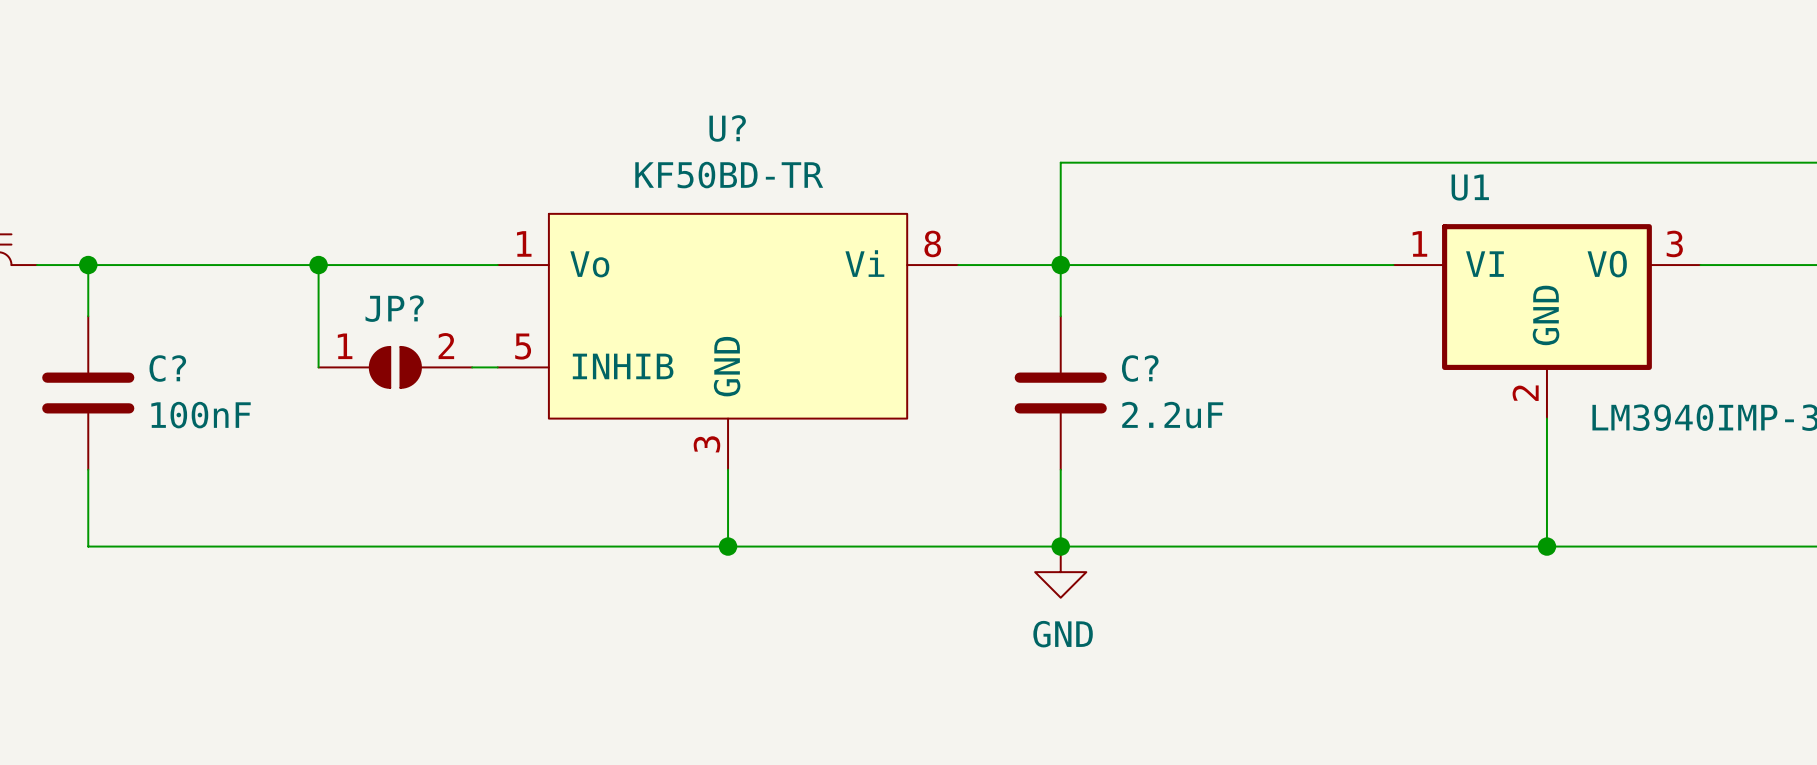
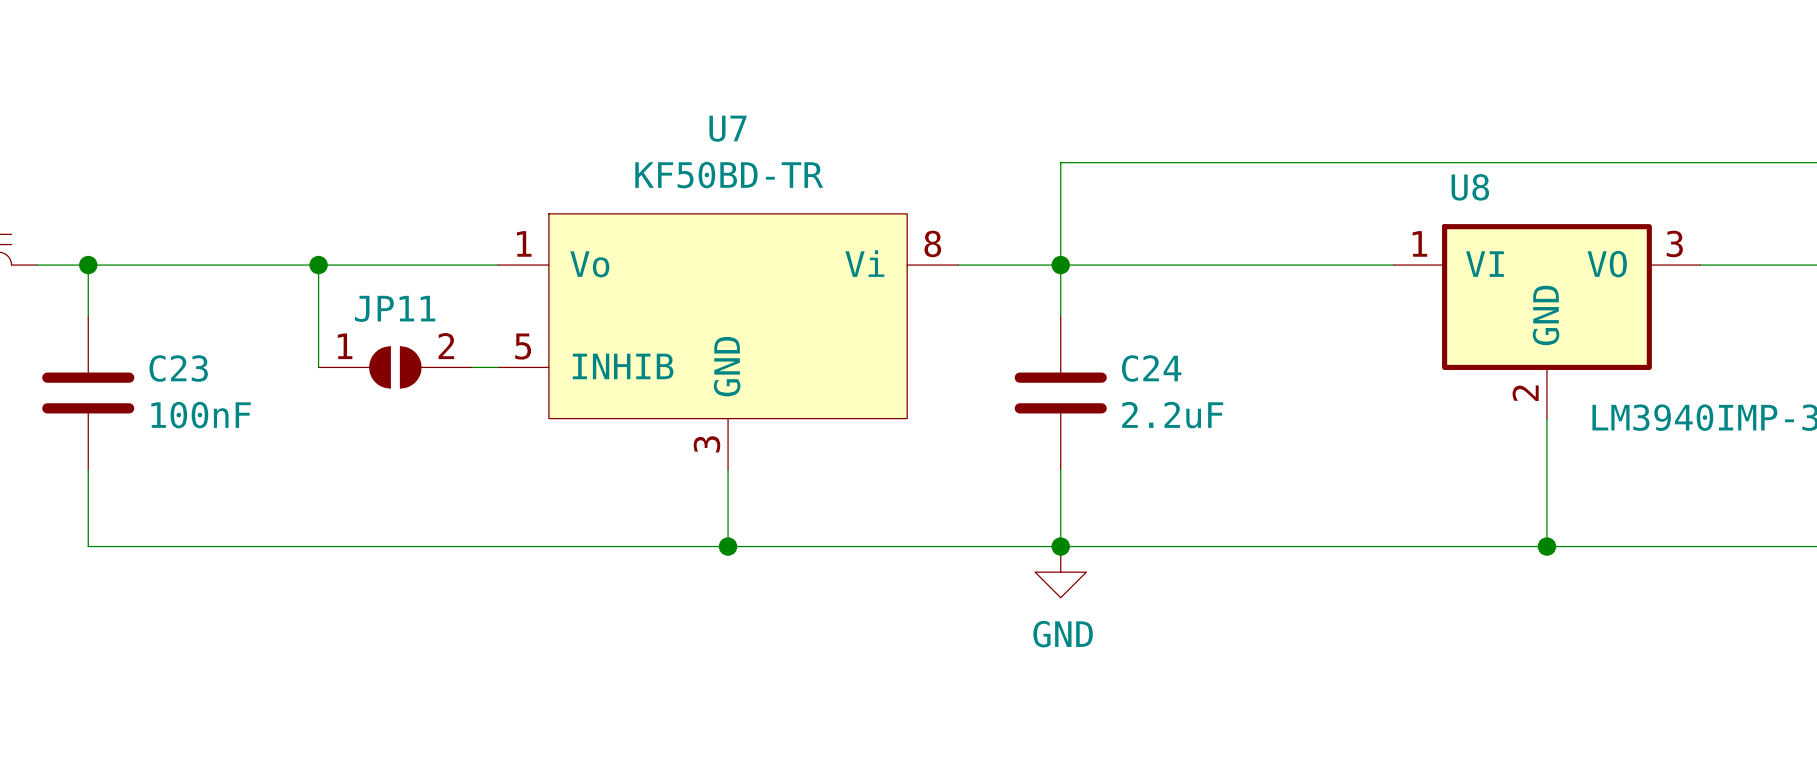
U? name: U? (727, 128) -> U7 (727, 128)
U1 name: U1 (1470, 187) -> U8 (1470, 187)
JP? name: JP? (394, 308) -> JP11 (395, 308)
C? name: C? (167, 368) -> C23 (178, 368)
C? name: C? (1140, 368) -> C24 (1151, 368)

